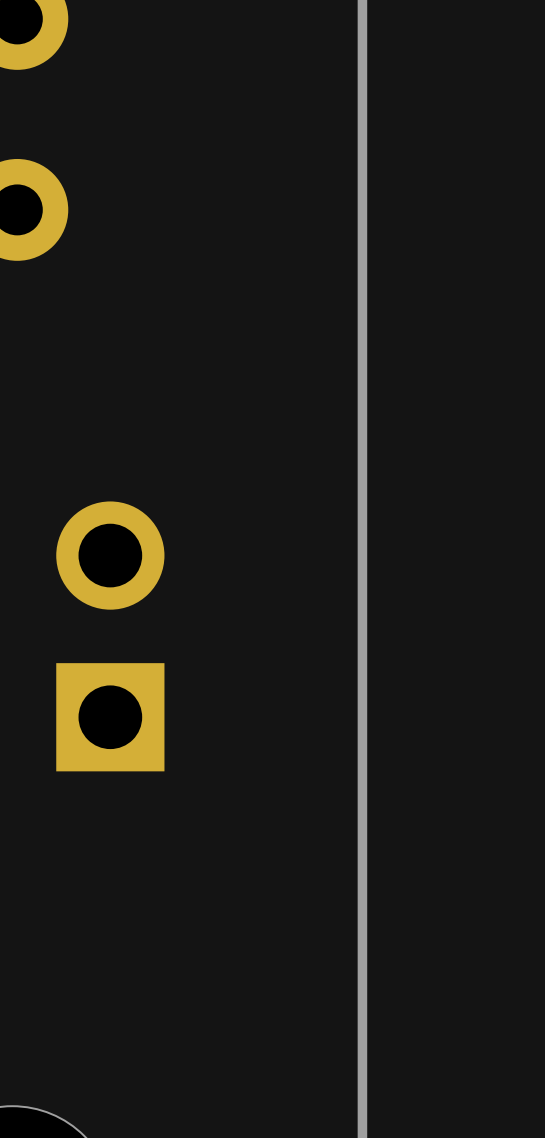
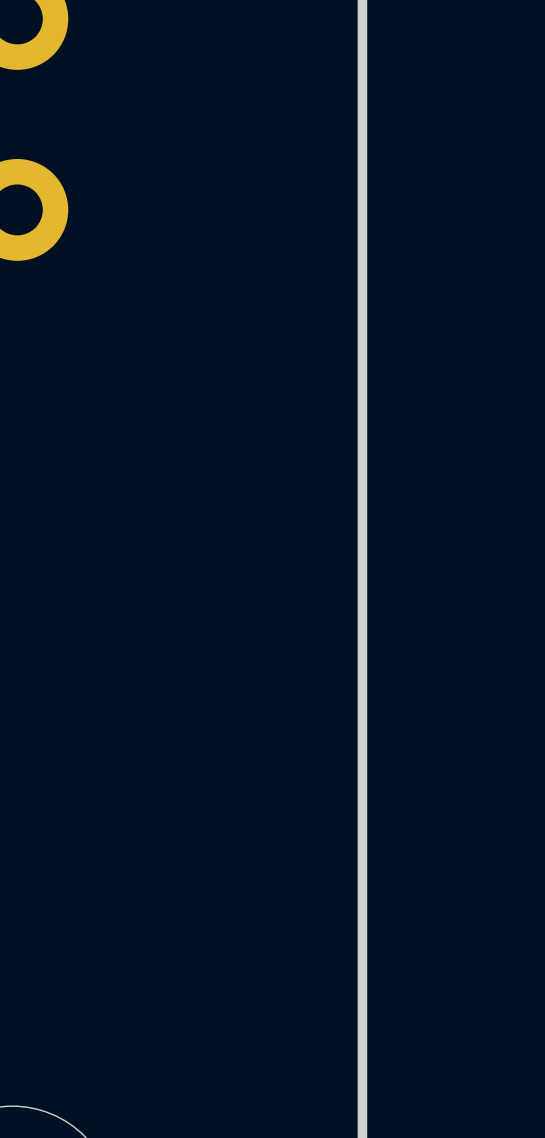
part: (110, 636) -> none

